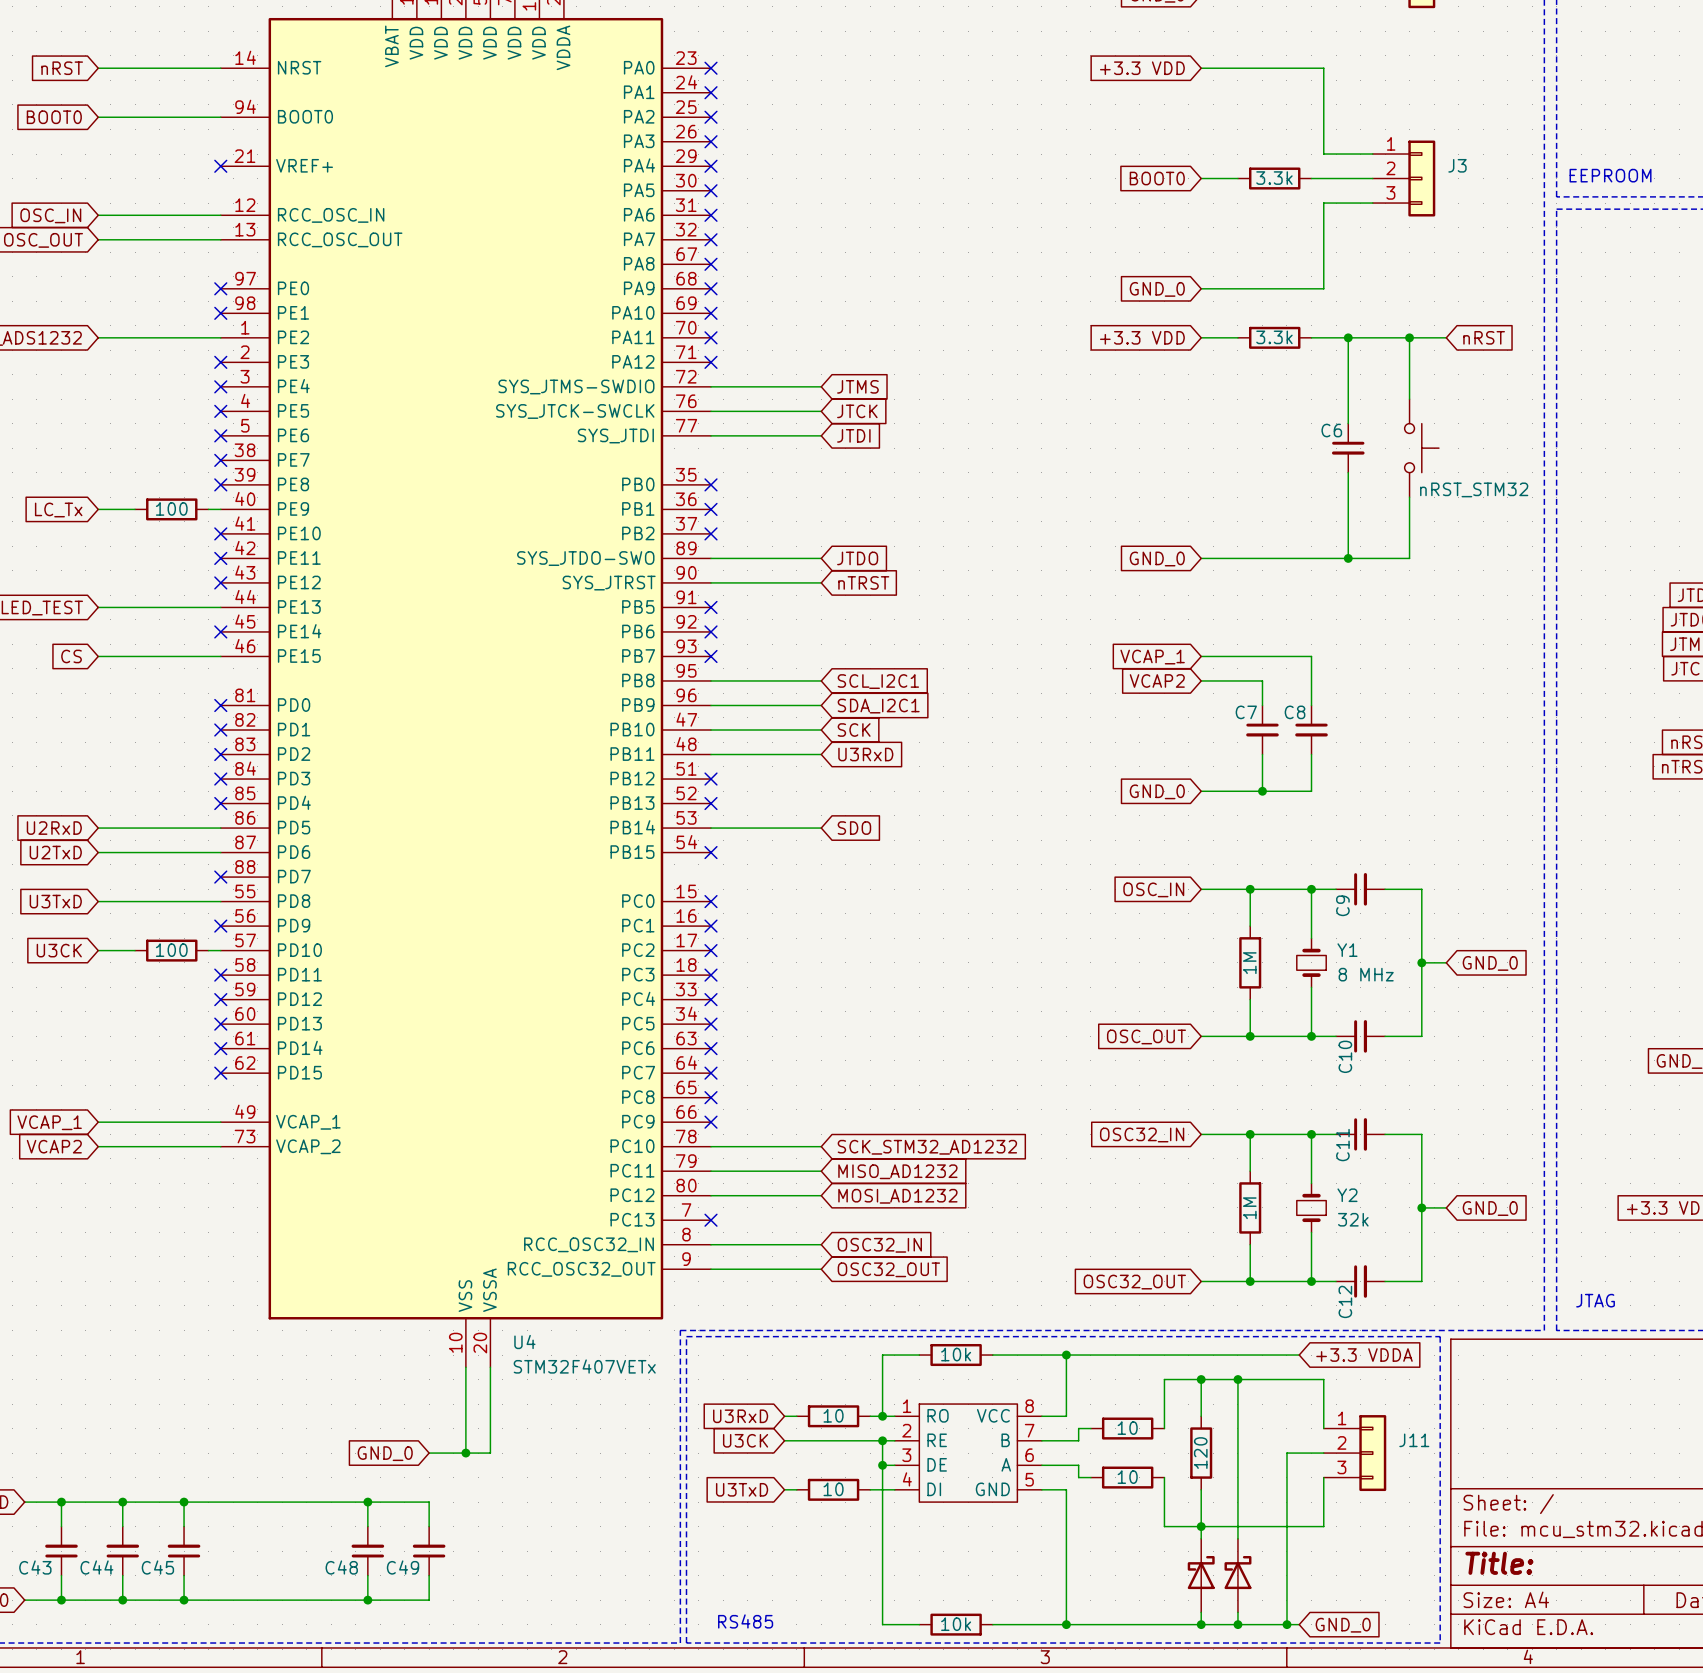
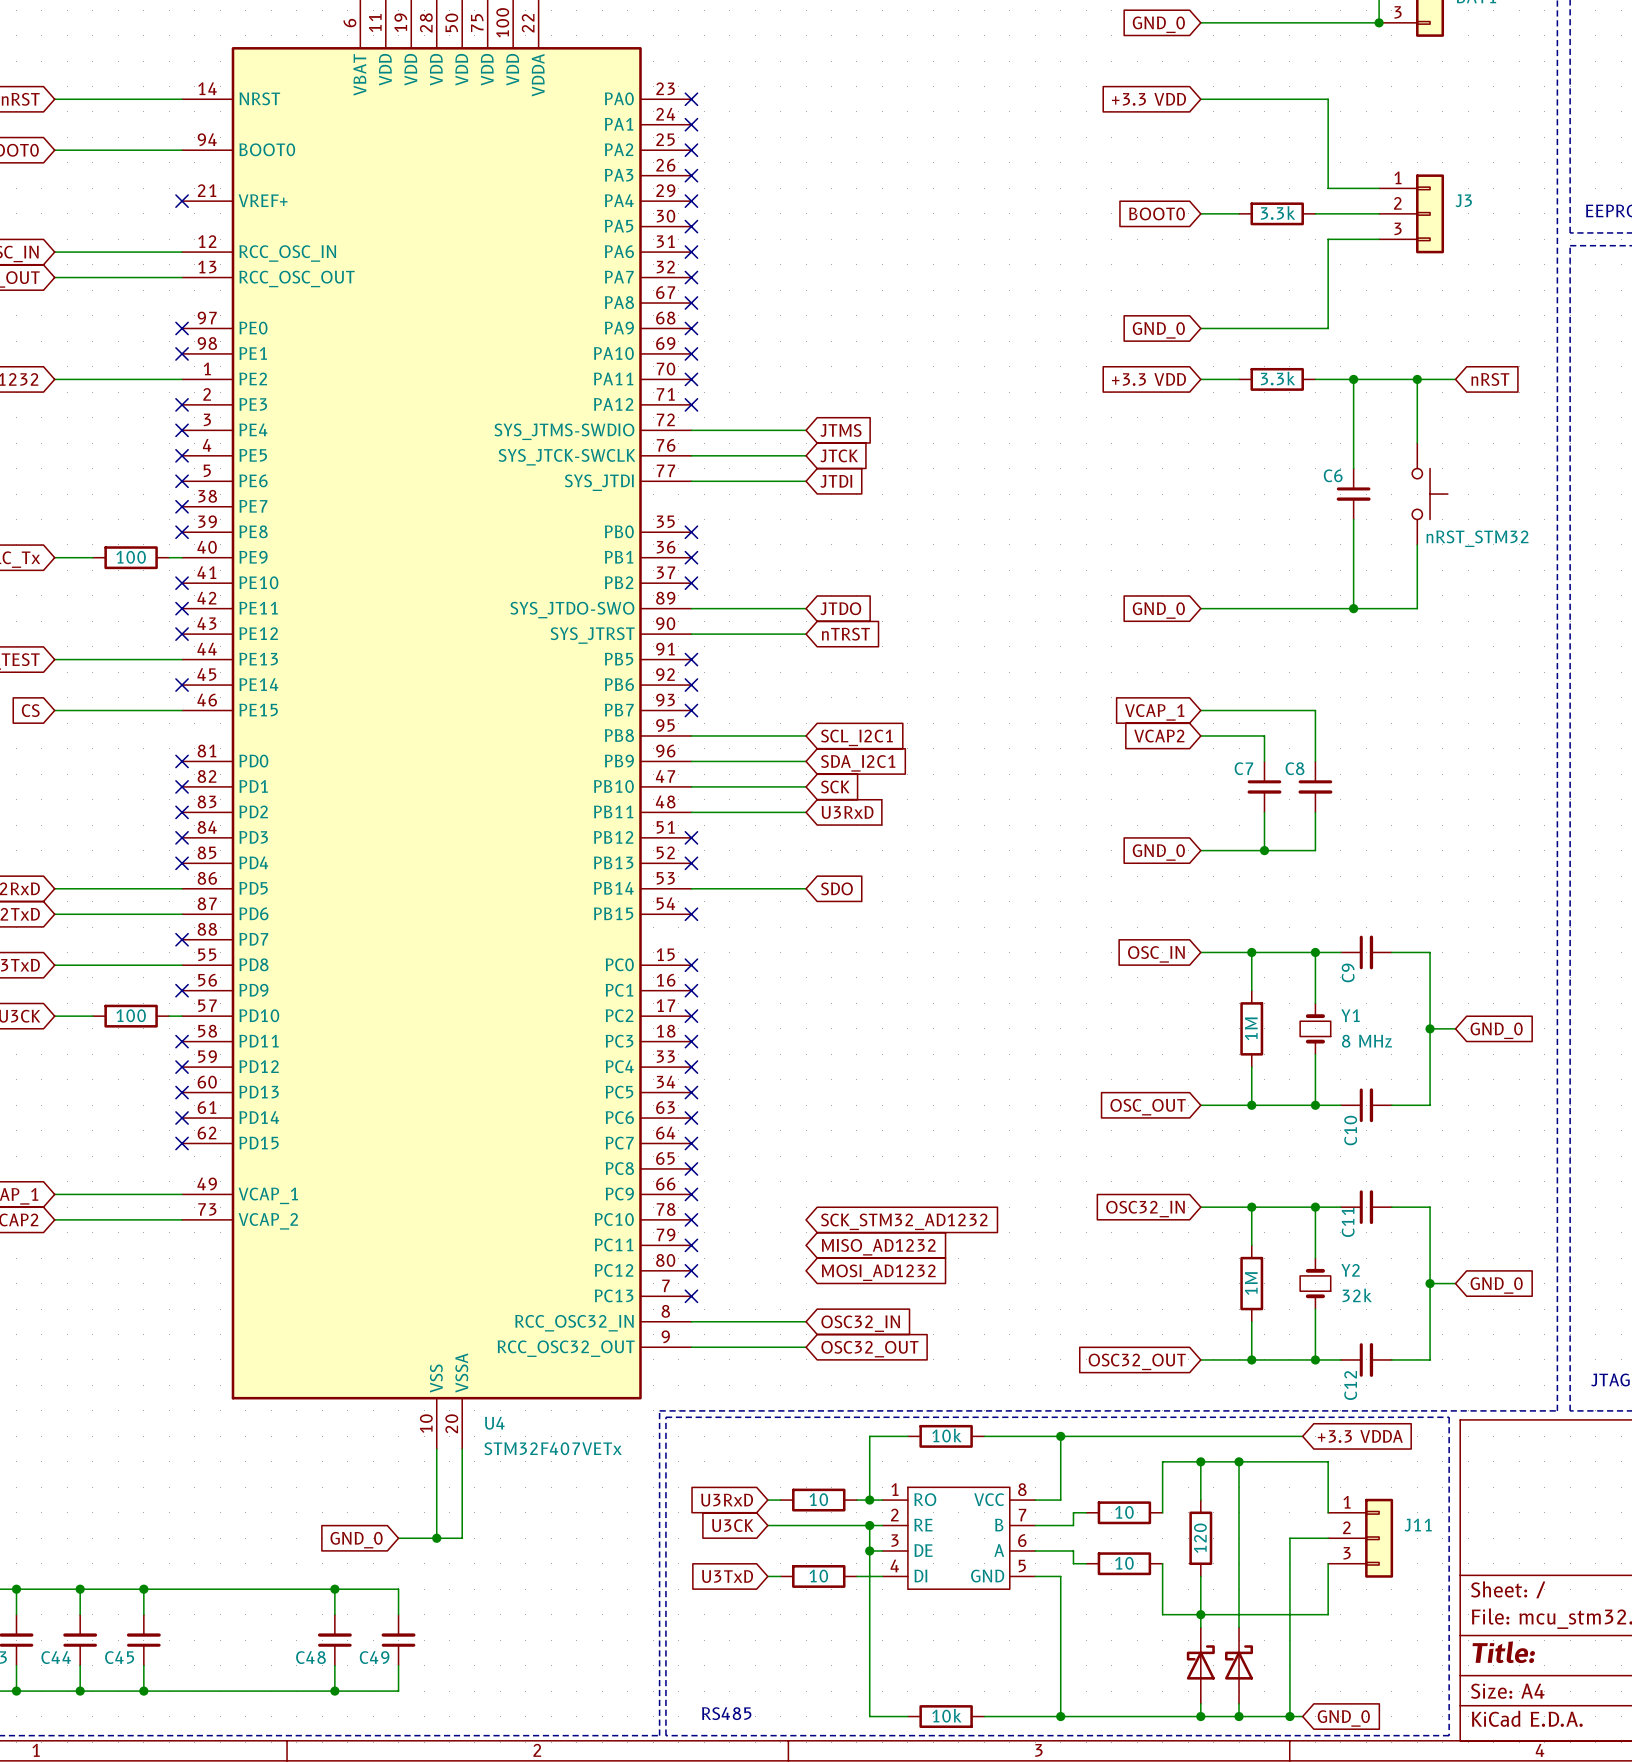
wire: (711, 1146) (821, 1146) -> none
no-connect mark: none -> (691, 1219)
wire: (711, 1171) (821, 1171) -> none
no-connect mark: none -> (691, 1245)
wire: (711, 1195) (821, 1195) -> none
no-connect mark: none -> (691, 1270)

